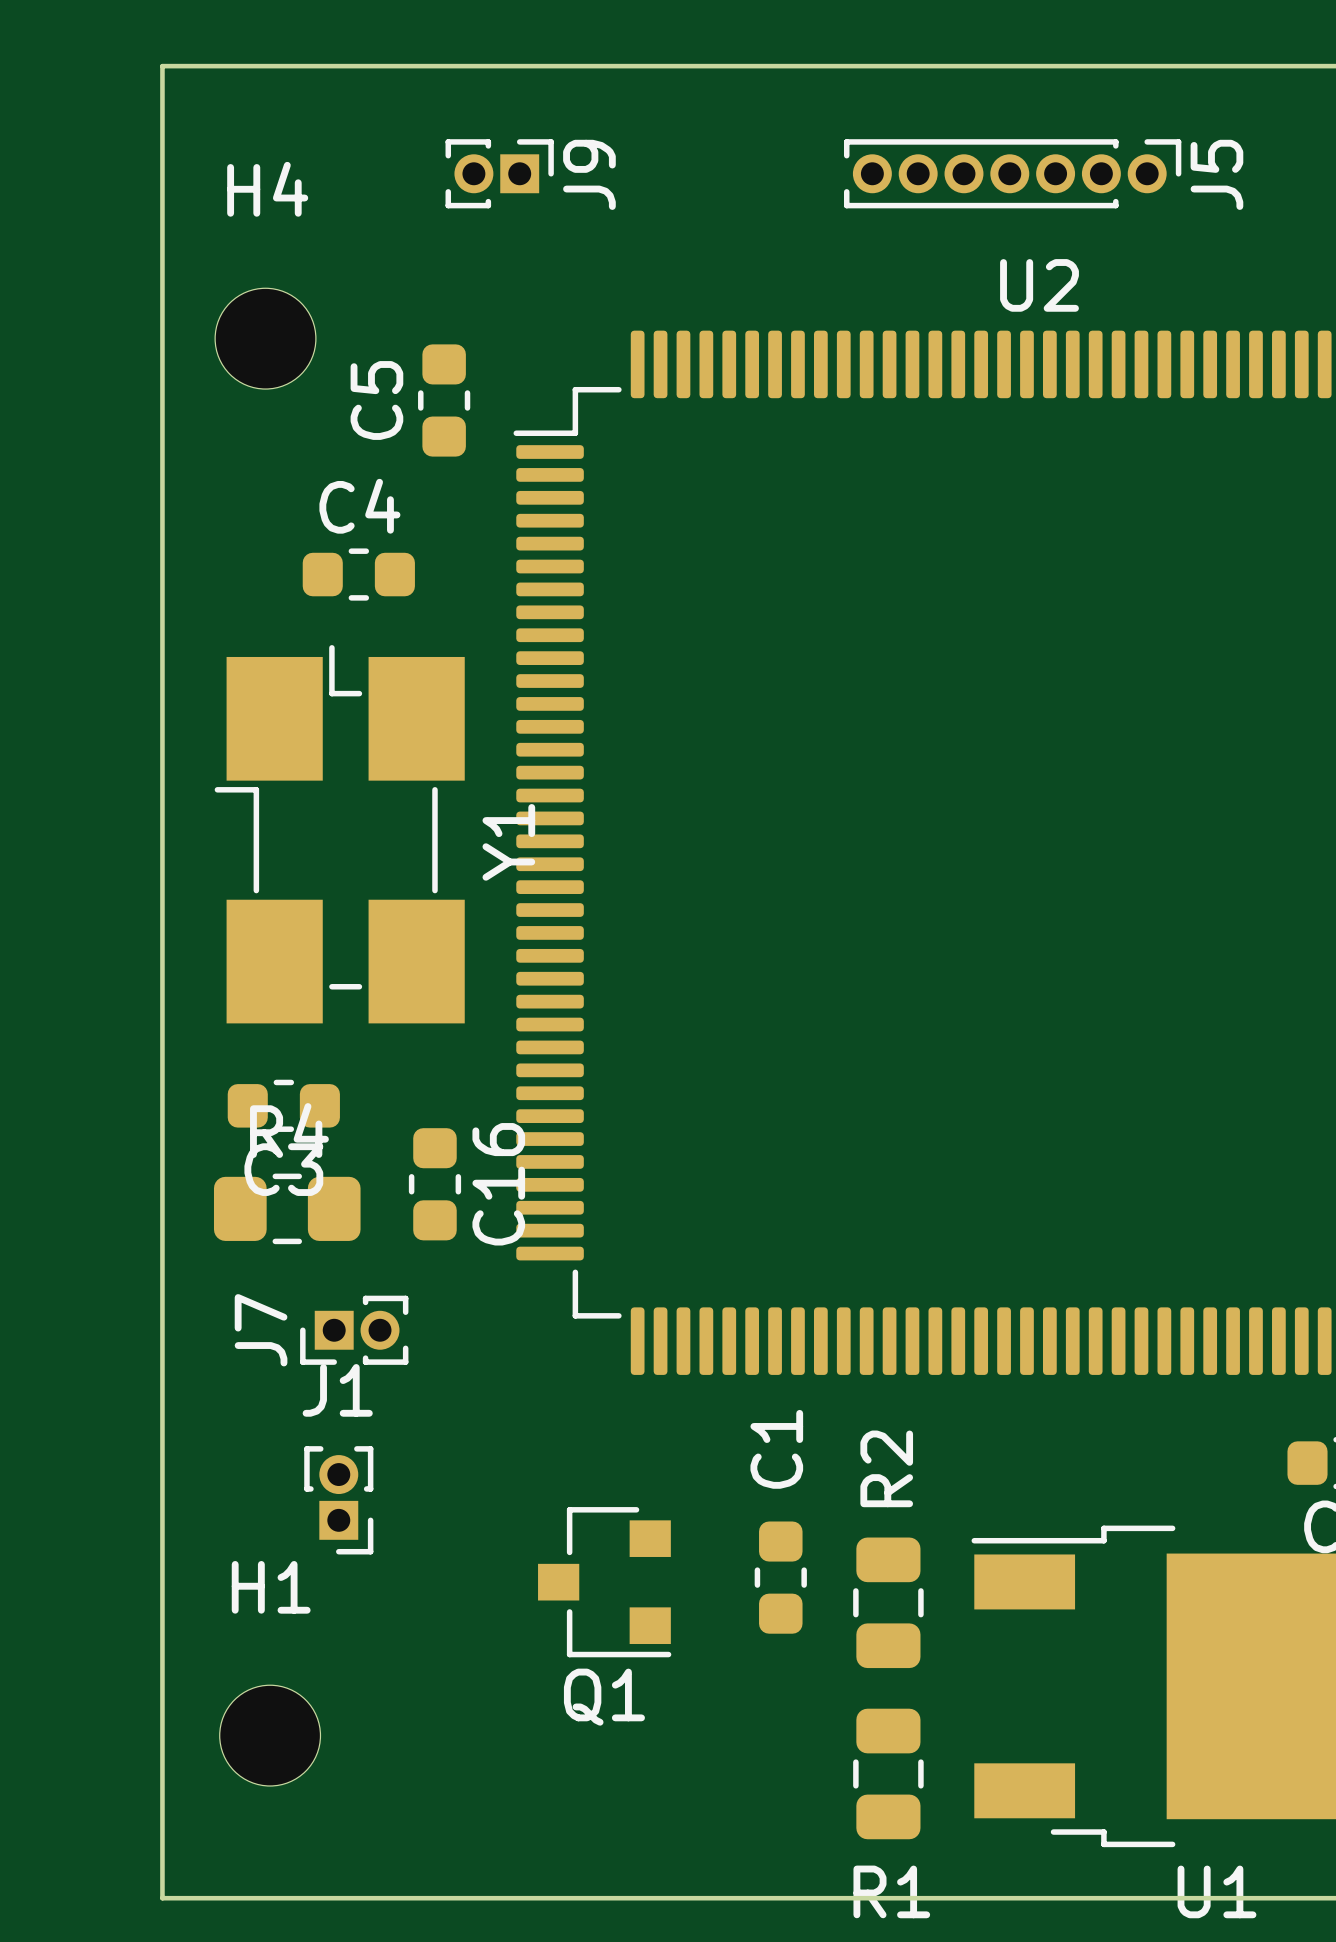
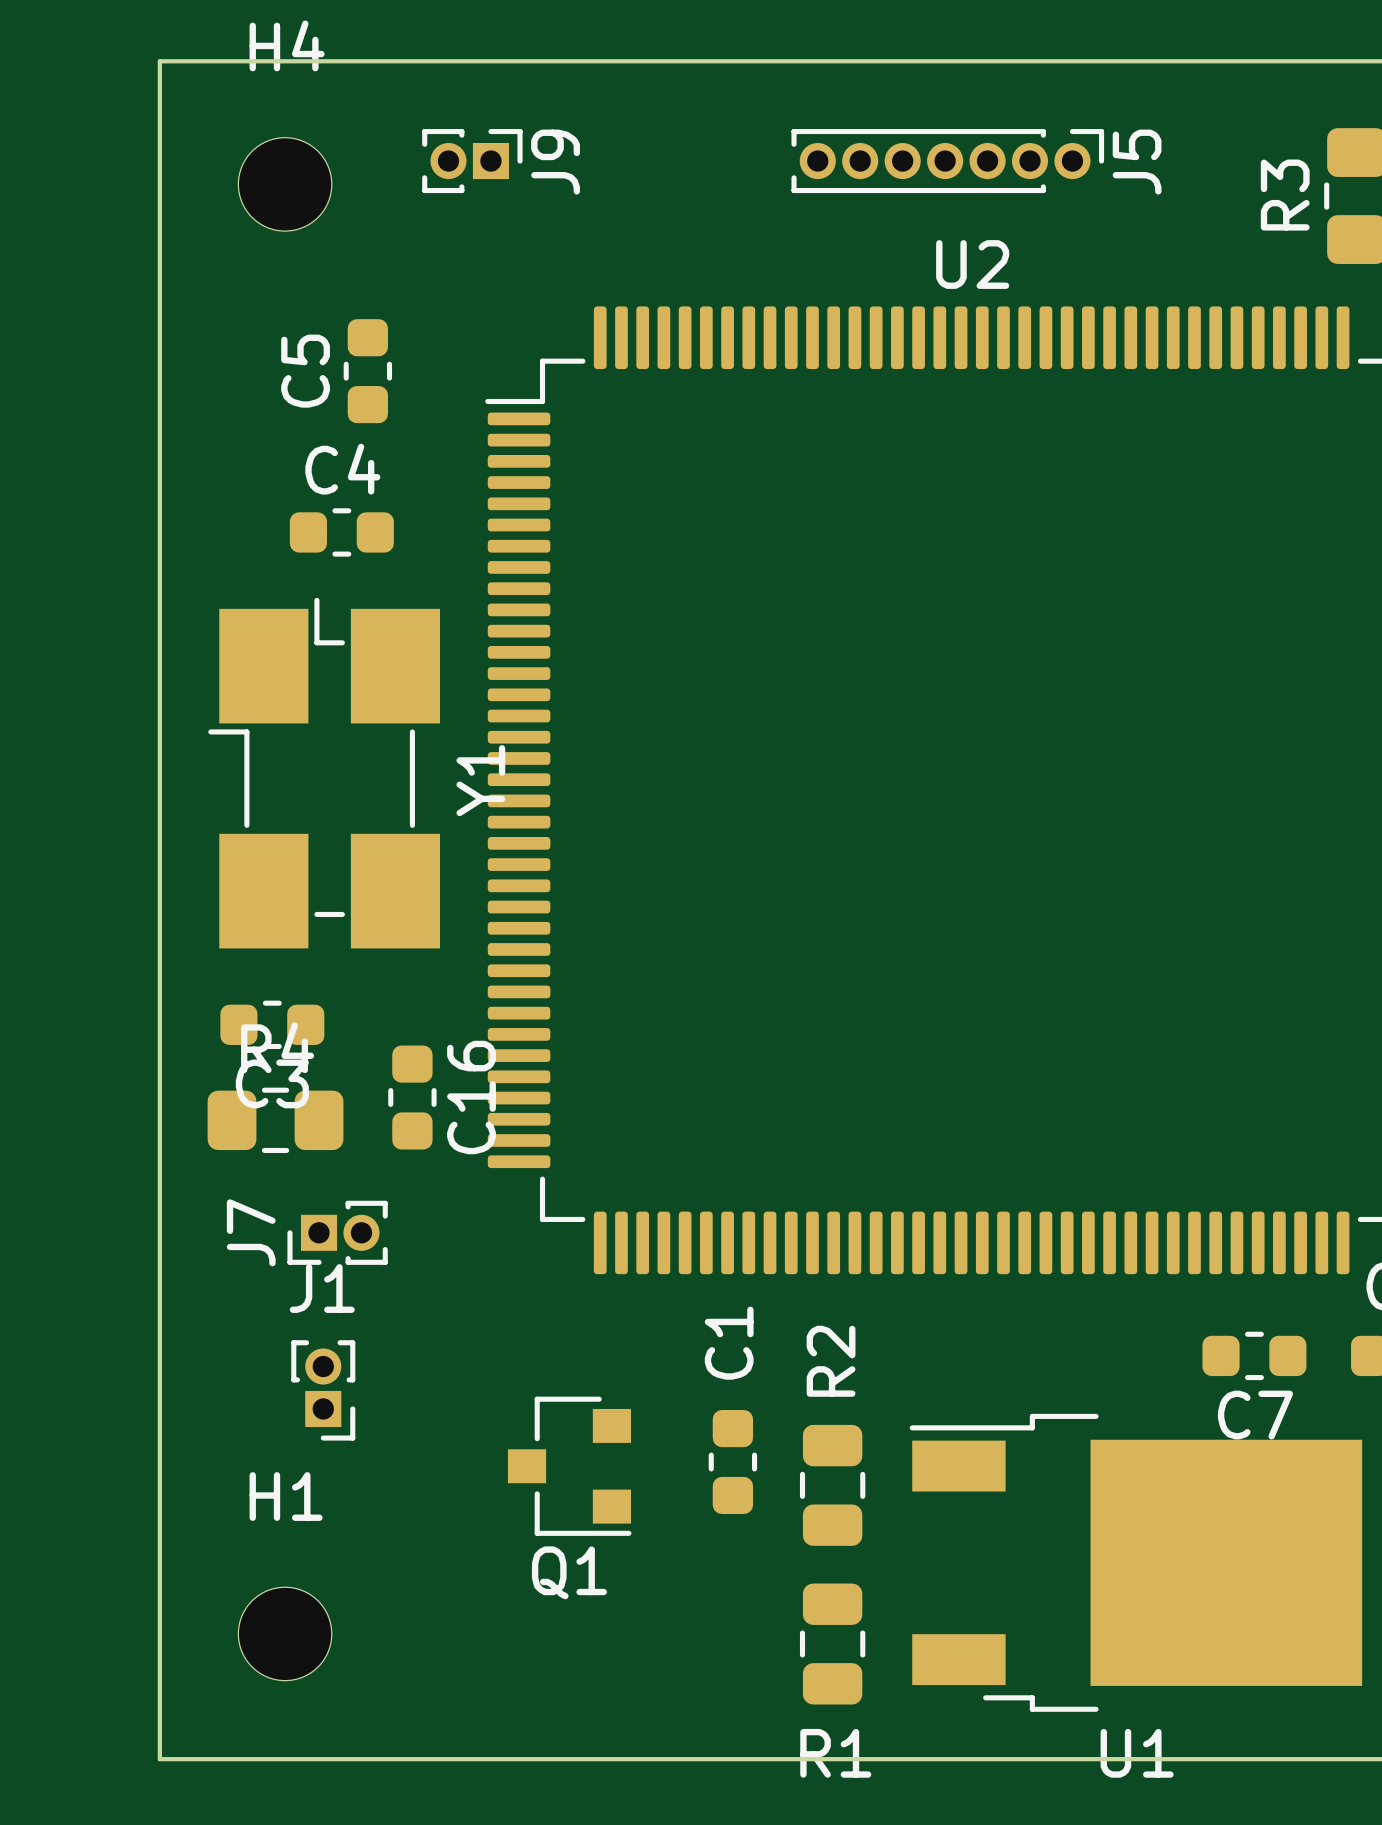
H4 position: (265, 338) -> (285, 184)
C5 position: (444, 400) -> (367, 371)
H1 position: (270, 1735) -> (285, 1633)

